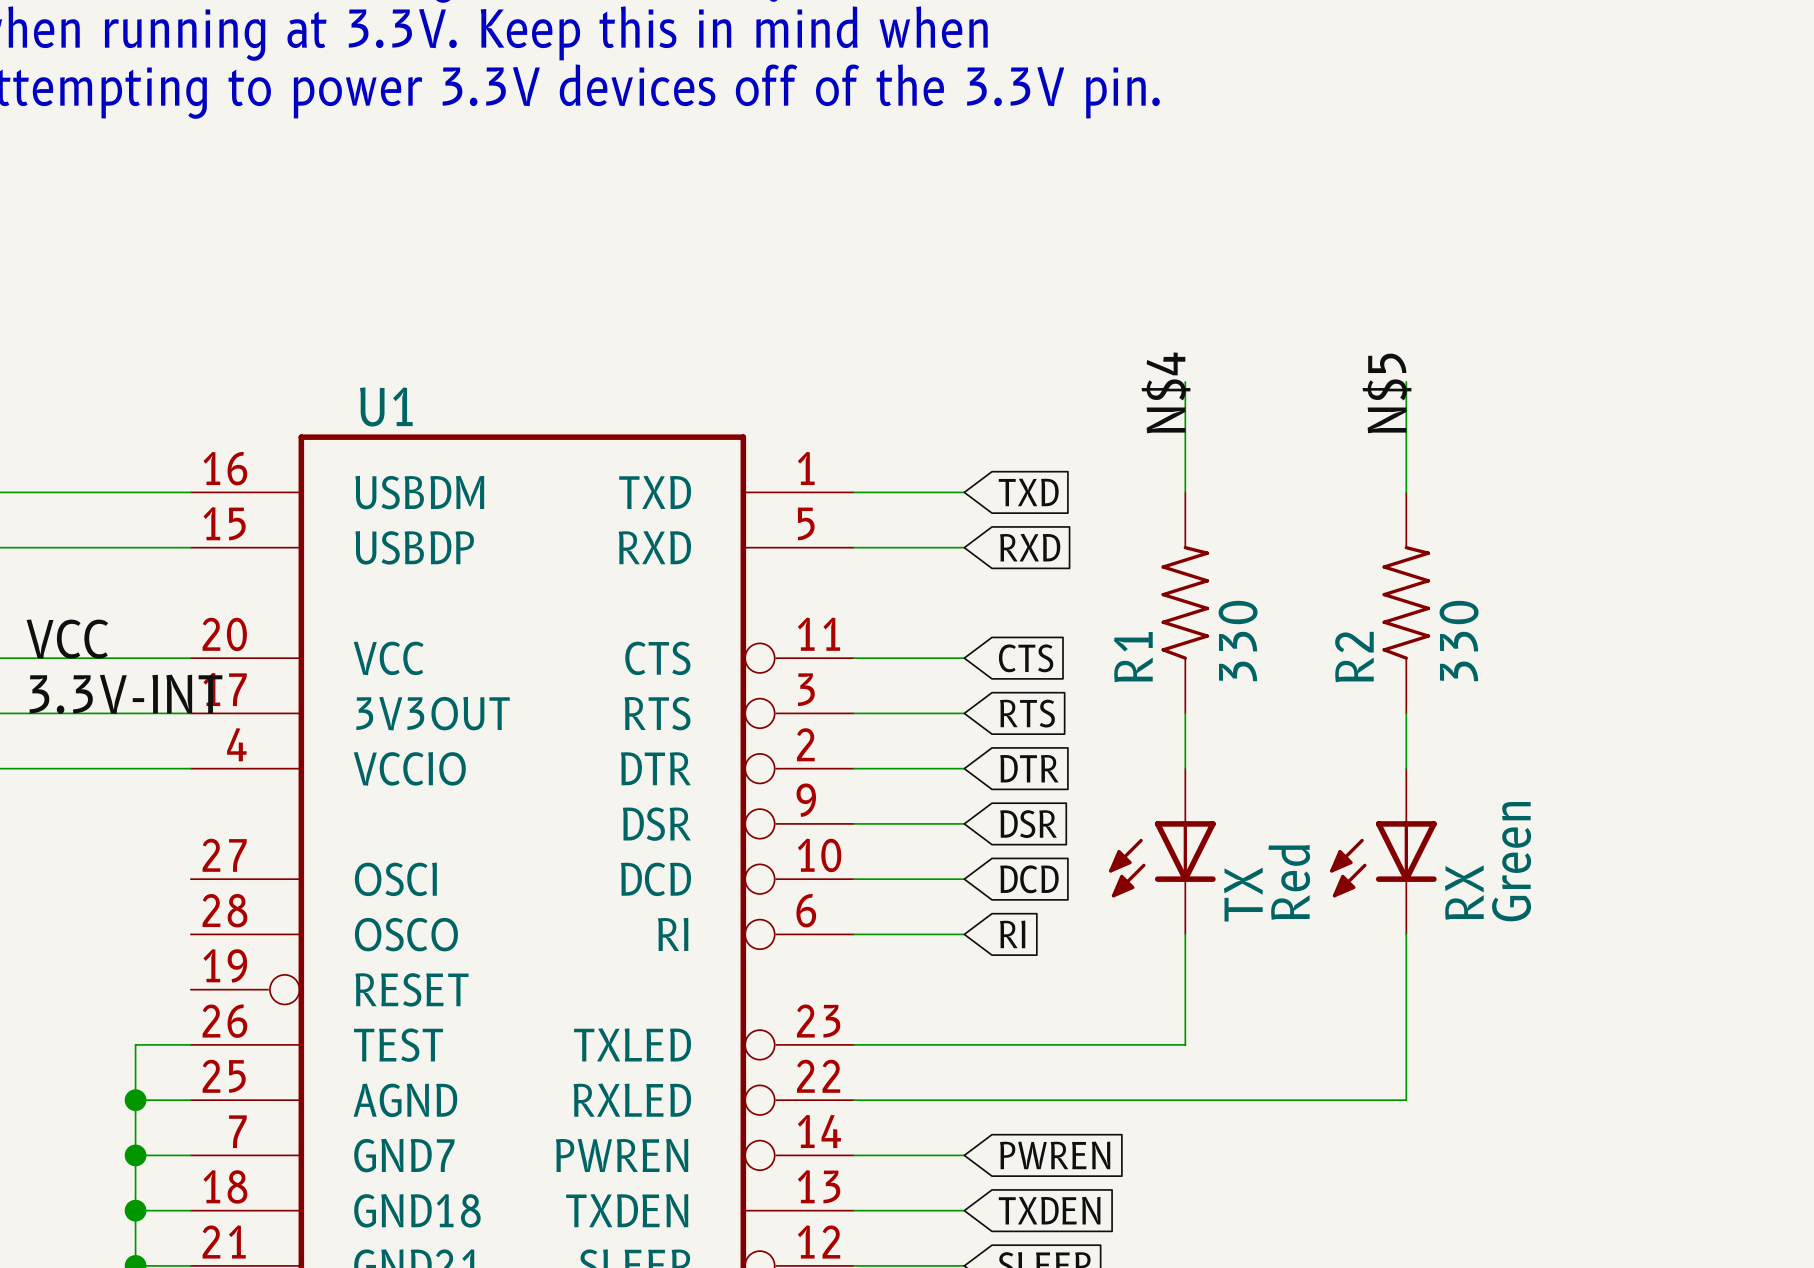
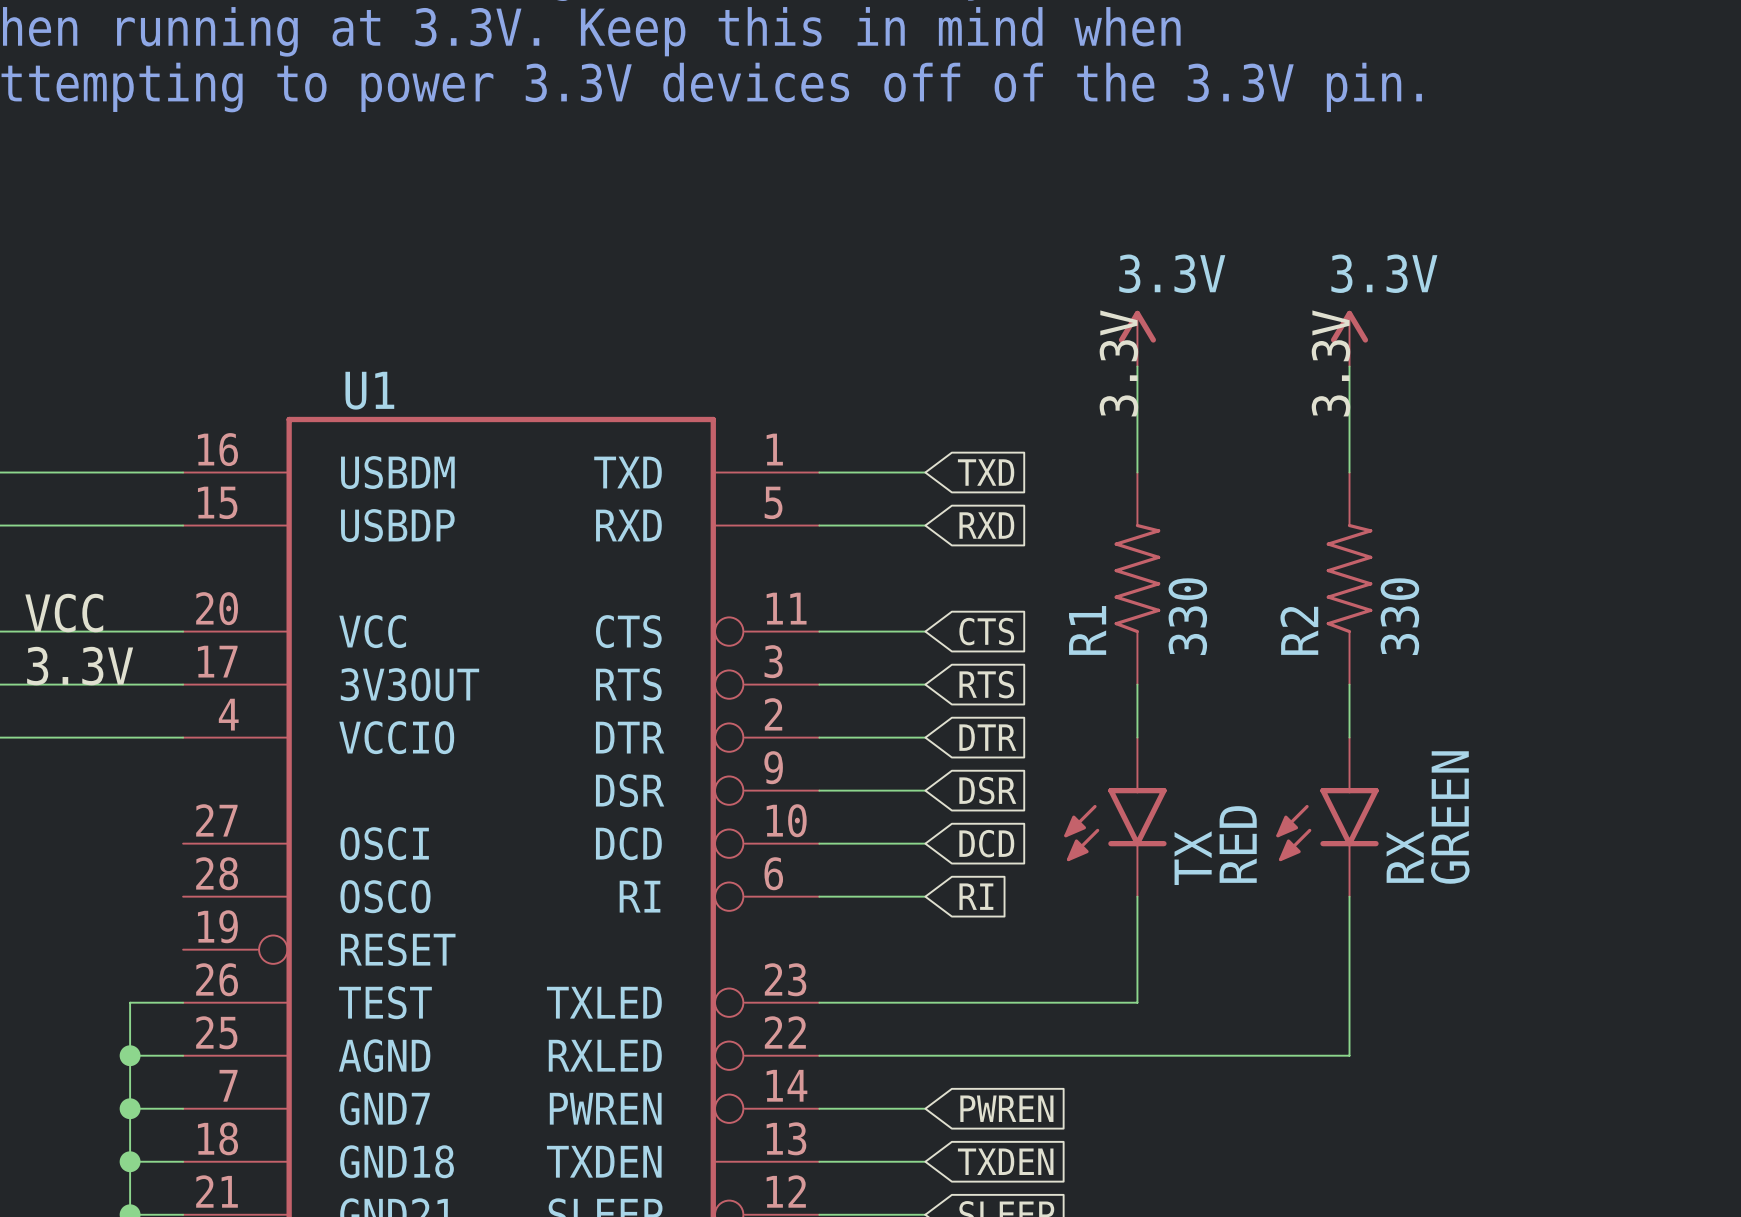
power symbol: none -> 3.3V (1137, 338)
power symbol: none -> 3.3V (1349, 338)
label: N$4 (1165, 392) -> 3.3V (1118, 363)
label: N$5 (1386, 393) -> 3.3V (1330, 363)
label: 3.3V-INT (126, 694) -> 3.3V (80, 666)
TX symbol: [1109, 768, 1216, 935] -> [1064, 737, 1167, 897]
RX symbol: [1330, 768, 1437, 935] -> [1276, 737, 1379, 897]
RX value: Green (1511, 861) -> GREEN (1450, 817)
TX value: Red (1289, 882) -> RED (1238, 844)

